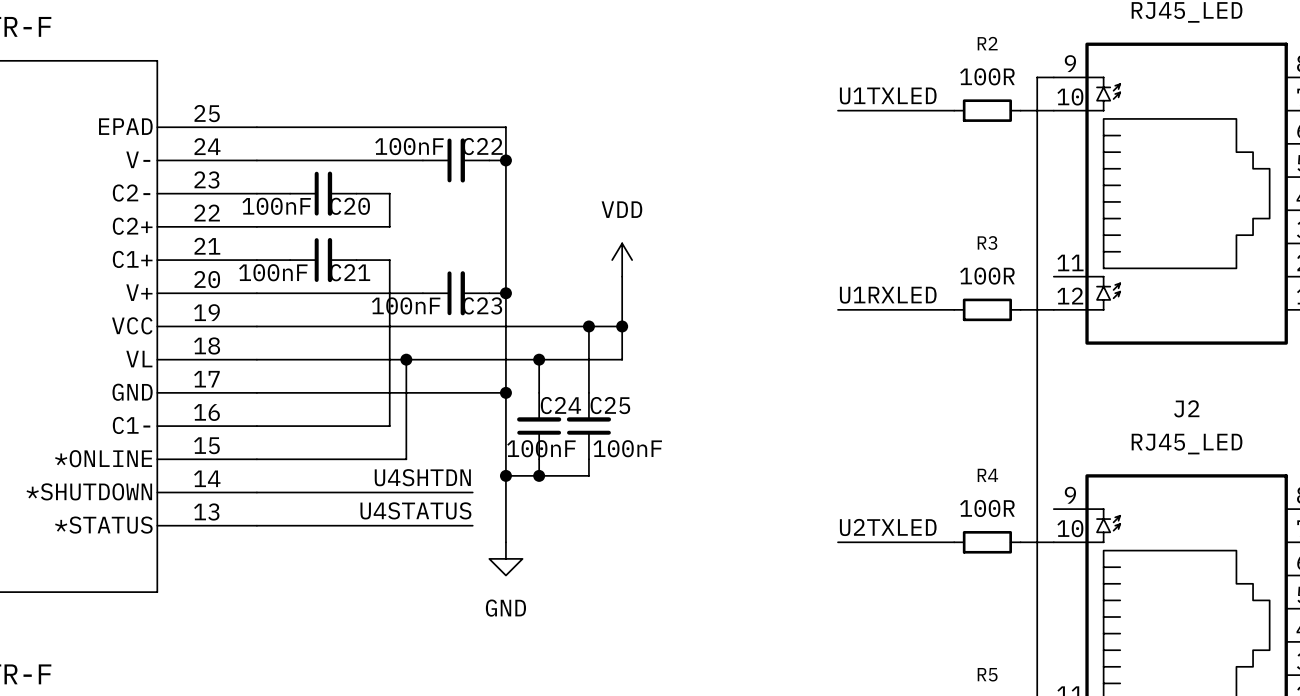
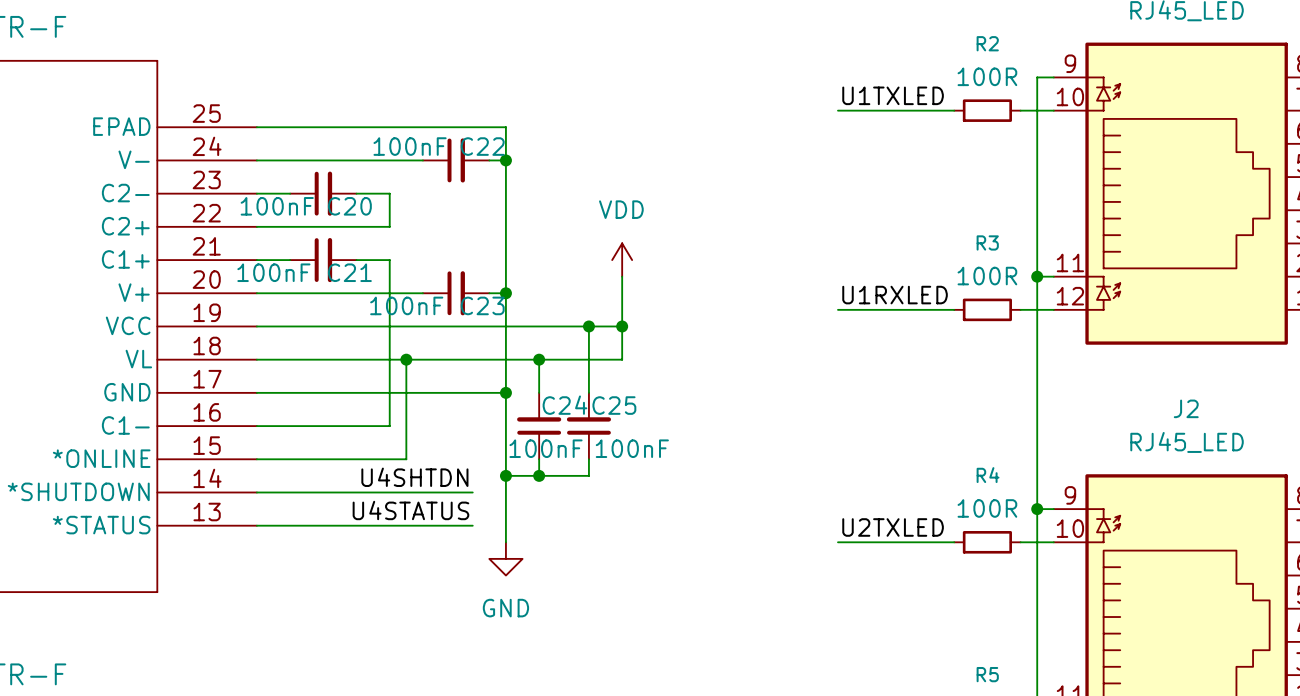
wire: none -> (1037, 276) (1053, 276)
junction: none -> (1037, 276)
wire: none -> (1037, 509) (1053, 509)
junction: none -> (1037, 509)

